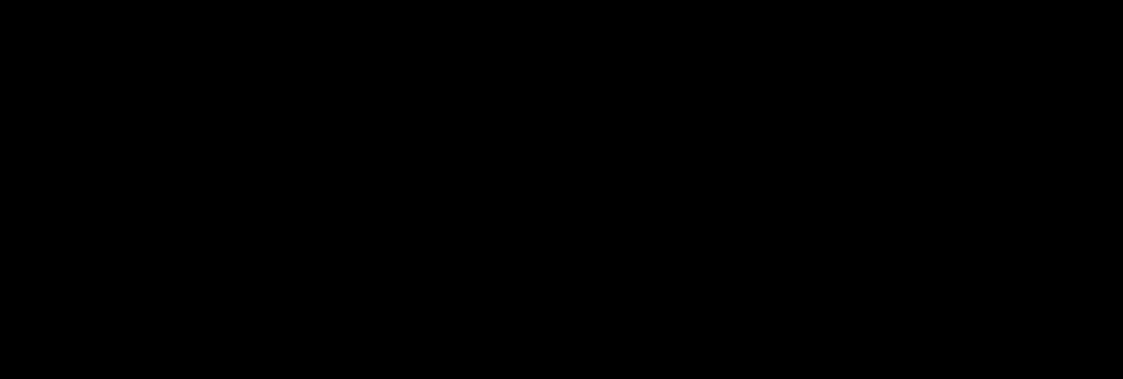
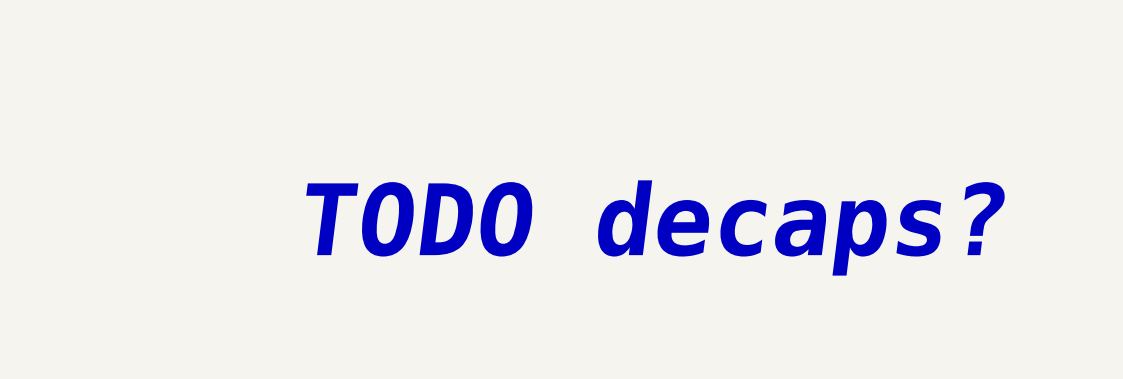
text: none -> TODO decaps? (655, 227)

